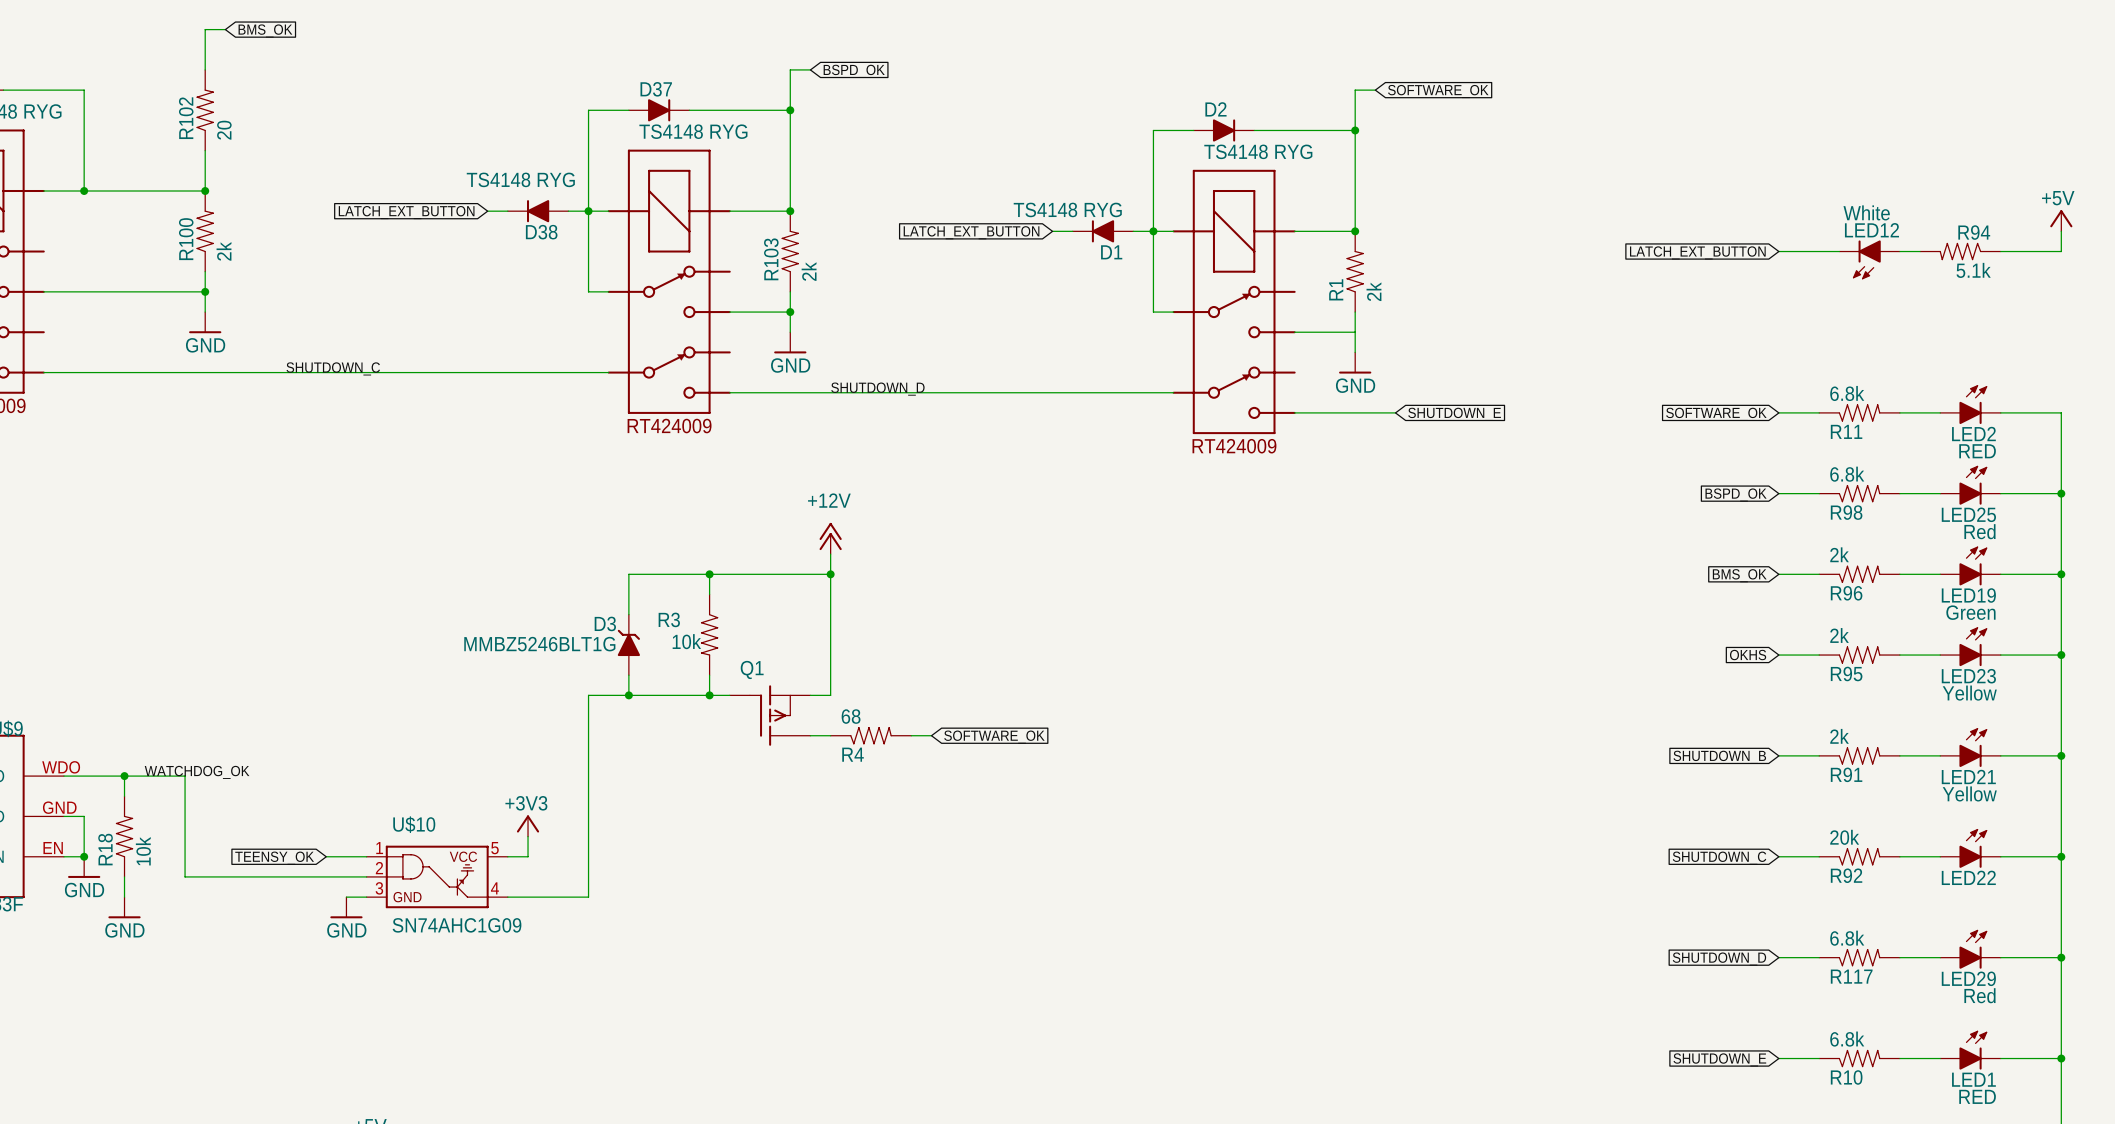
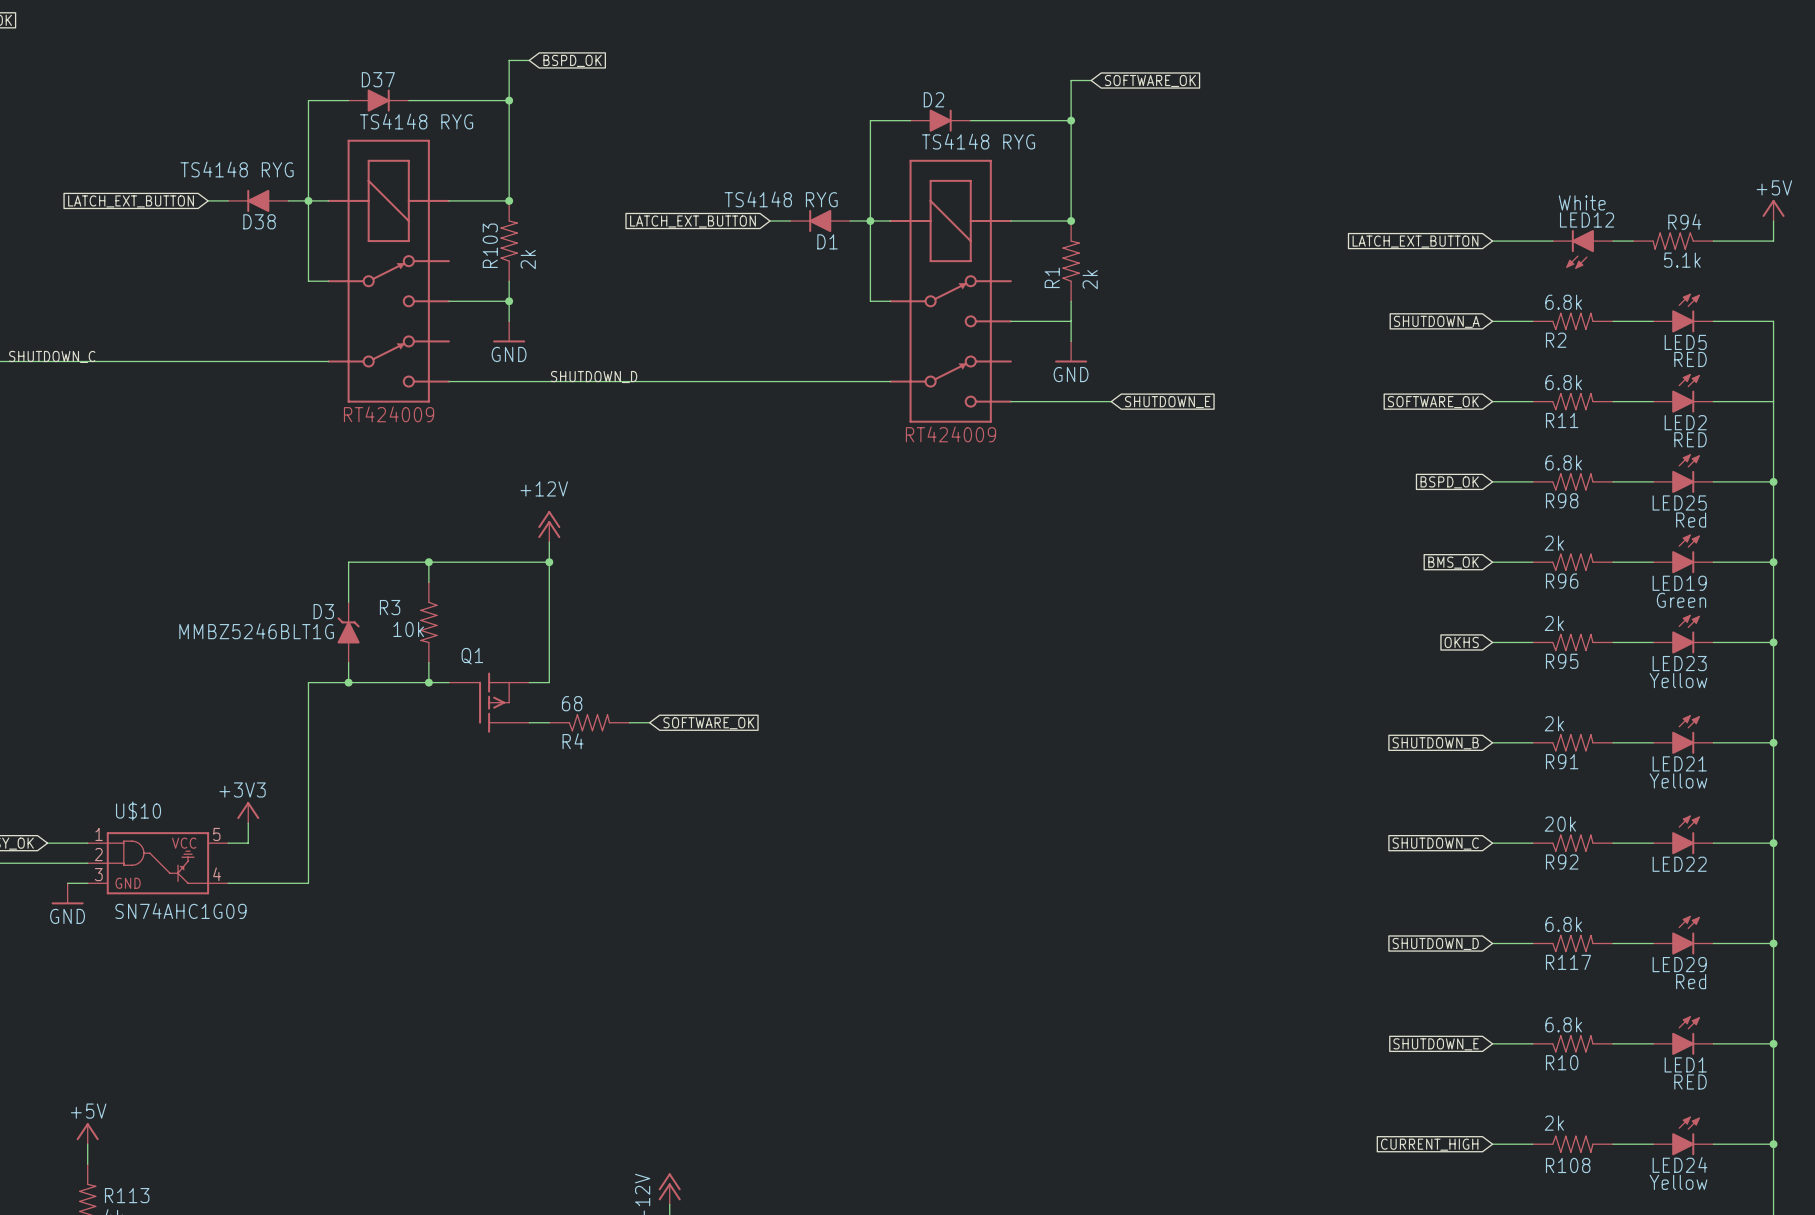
LED5: none -> RED (1683, 313)
wire: none -> (1492, 321) (1532, 321)
R2: none -> 6.8k (1572, 321)
wire: none -> (1612, 321) (1653, 321)
wire: none -> (1713, 321) (1773, 321) (1773, 401)
global label: none -> SHUTDOWN_A (1436, 321)

